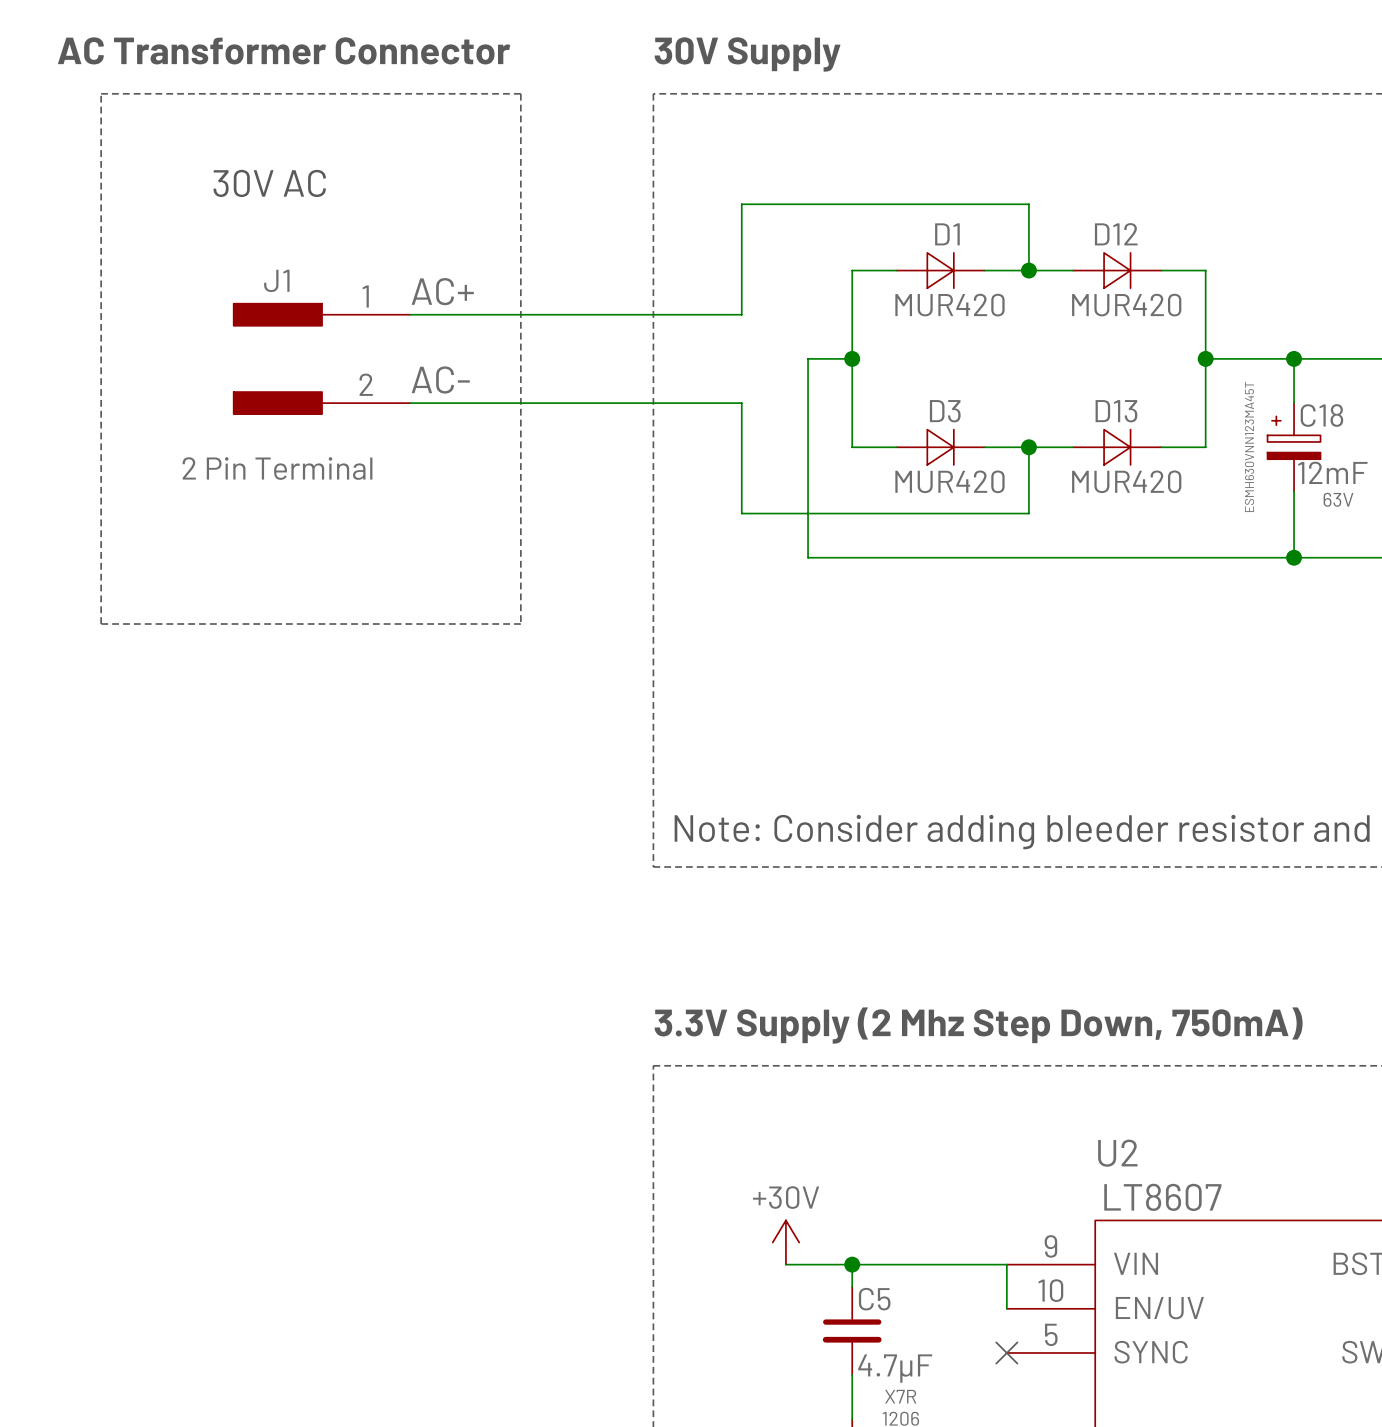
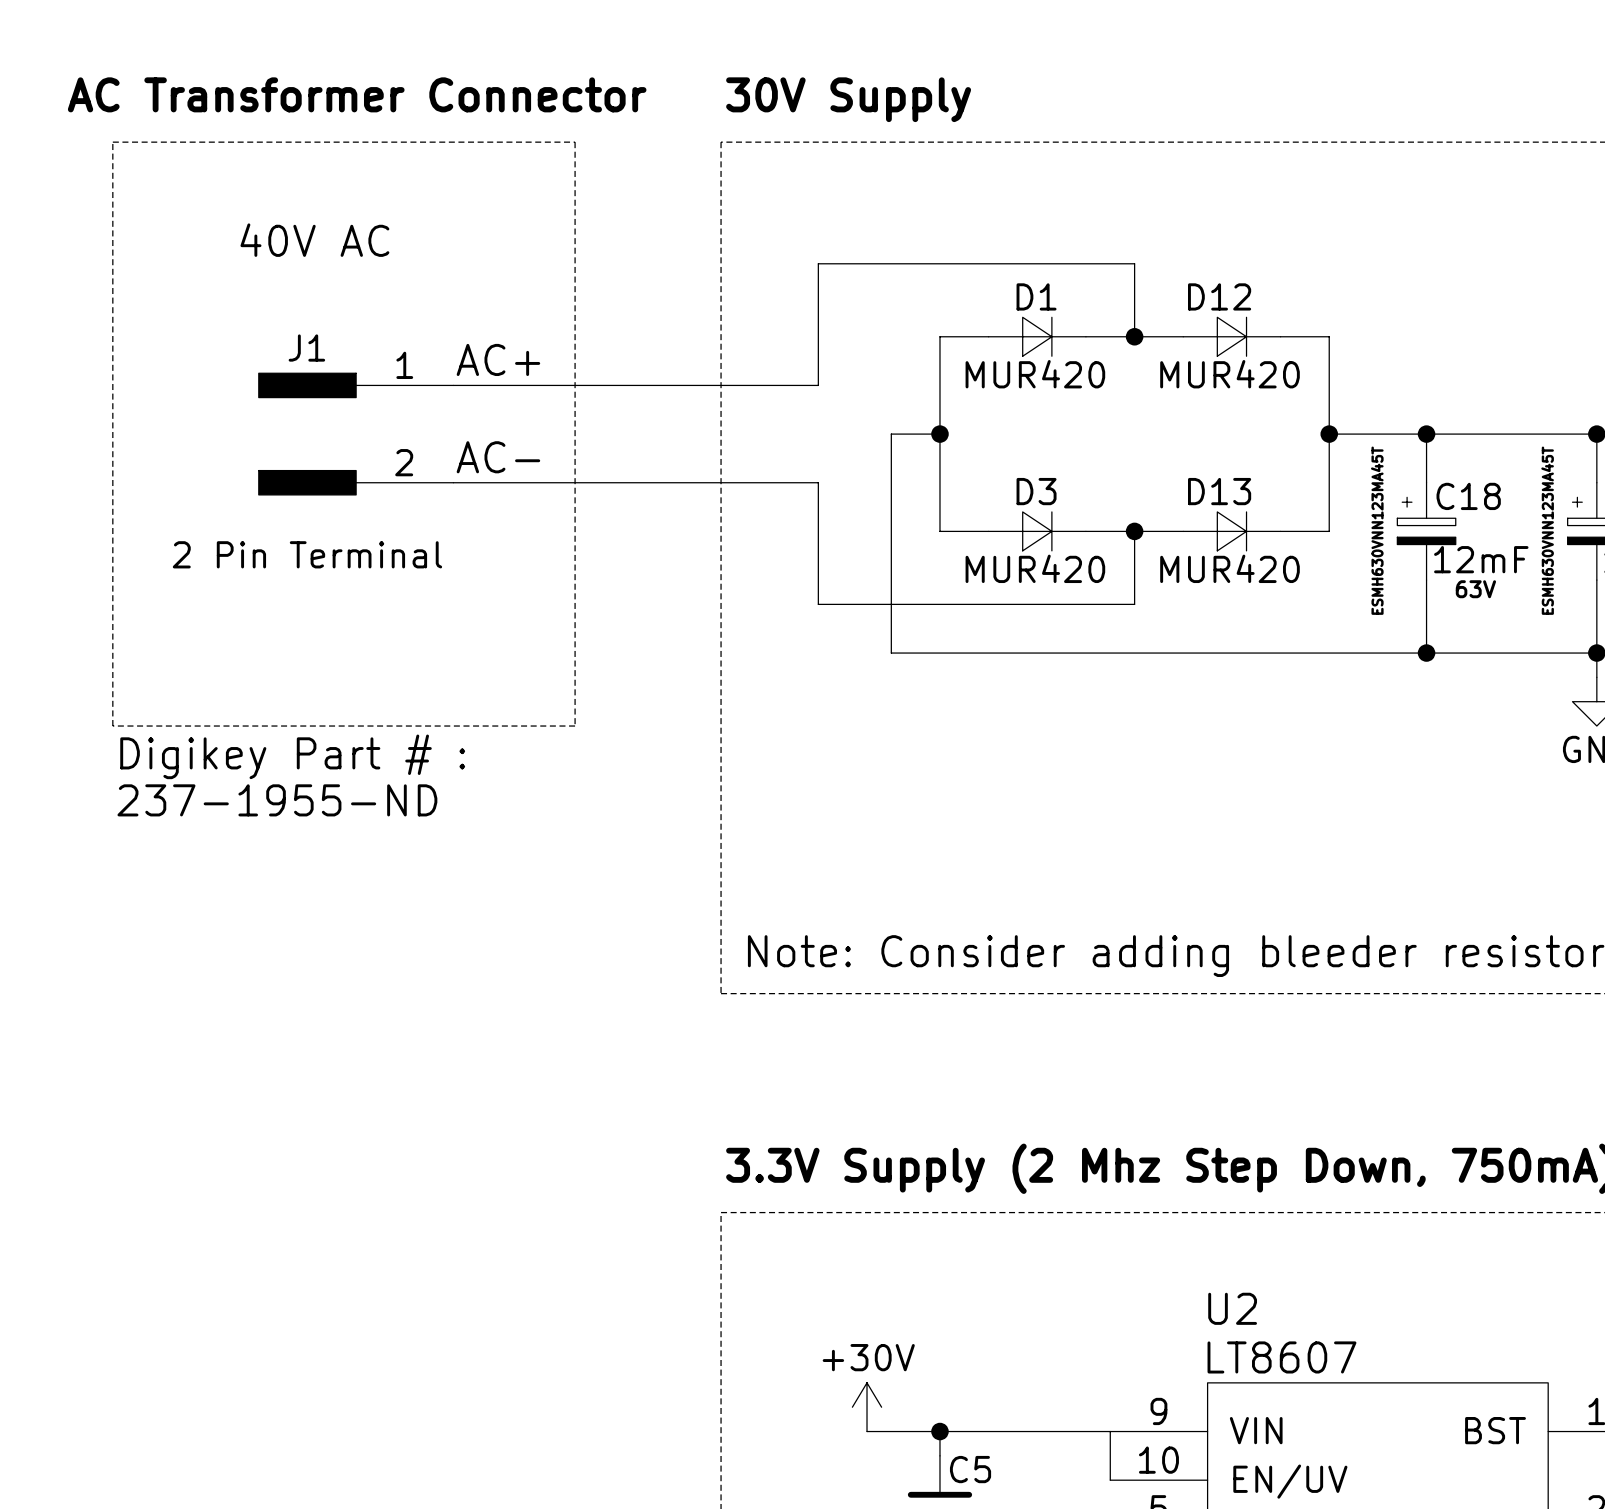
text: 30V AC (269, 183) -> 40V AC (314, 240)
text: none -> Digikey Part # : (292, 756)
text: none -> 237-1955-ND (277, 800)

